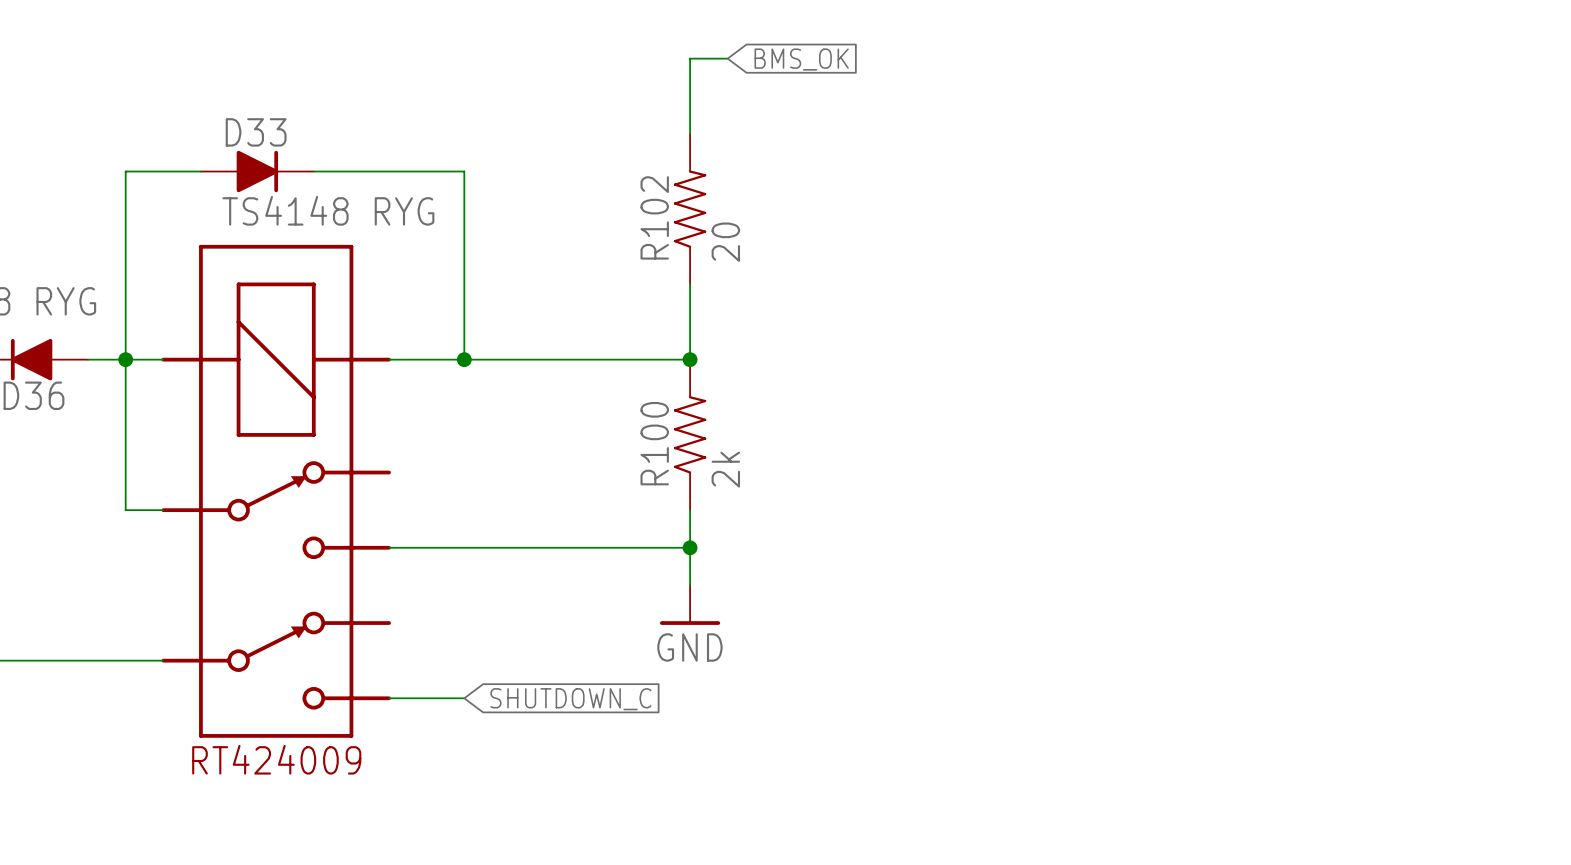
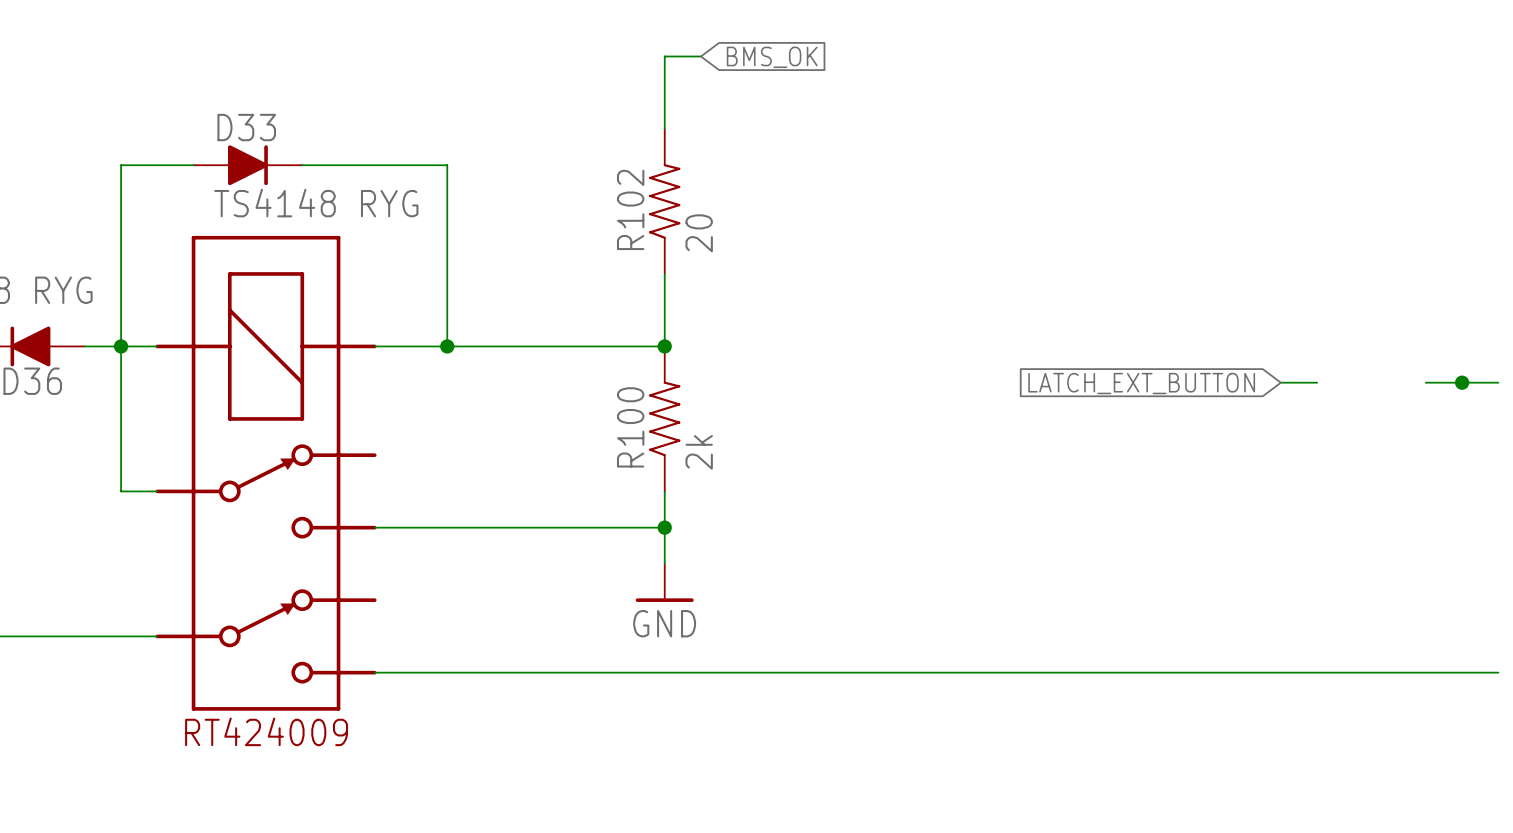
wire: none -> (1280, 382) (1317, 382)
wire: none -> (1425, 382) (1498, 382)
junction: none -> (1462, 382)
global label: none -> LATCH_EXT_BUTTON (1141, 383)
wire: none -> (447, 672) (1498, 672)
global label: SHUTDOWN_C (570, 699) -> none

